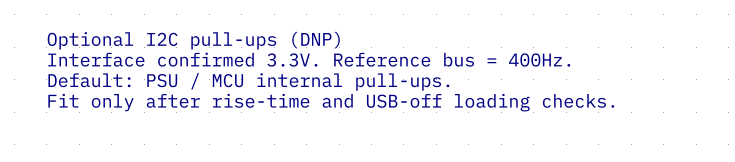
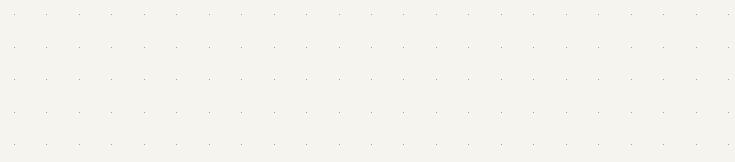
text: Optional I2C pull-ups (DNP) (193, 40) -> none
text: Interface confirmed 3.3V. Reference bus = 400Hz. (309, 59) -> none
text: Default: PSU / MCU internal pull-ups. (248, 81) -> none
text: Fit only after rise-time and USB-off loading checks. (331, 102) -> none

